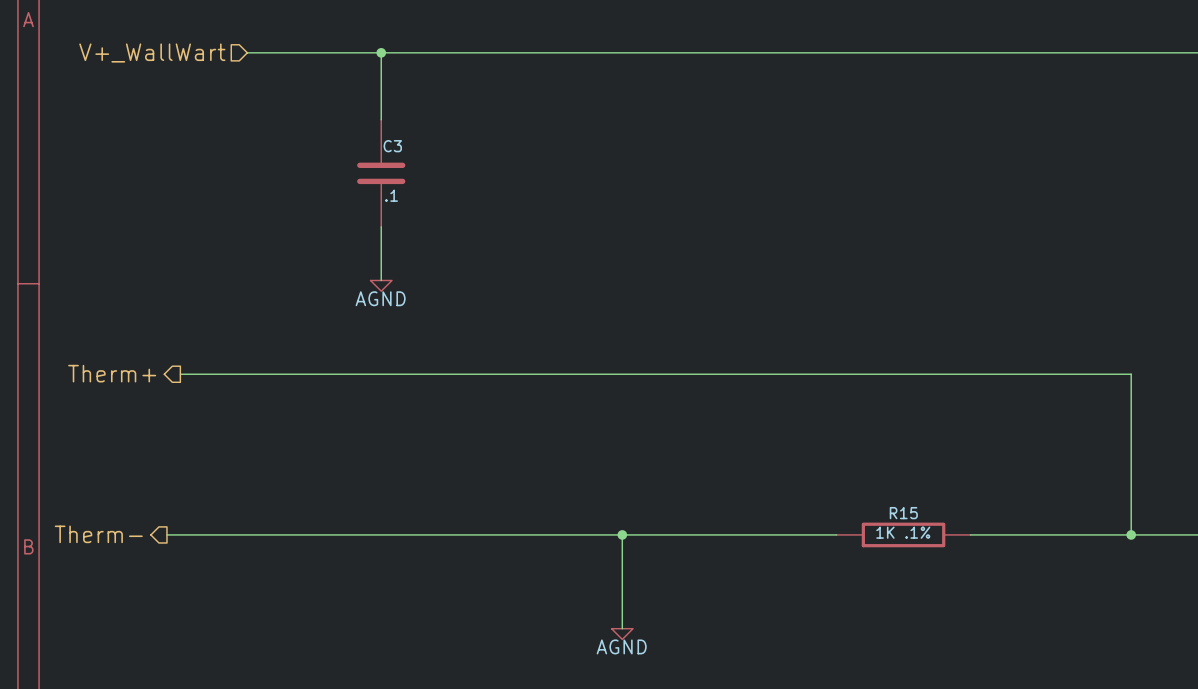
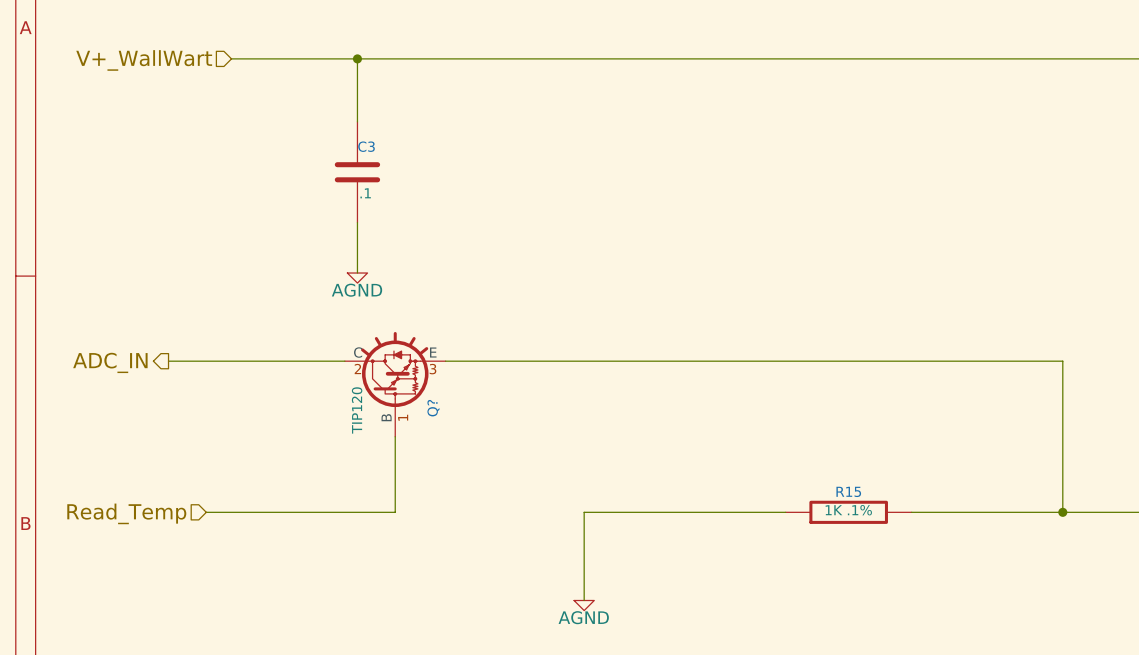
hierarchical label: Therm+ (112, 373) -> ADC_IN (110, 362)
Q?: none -> TIP120 (395, 384)
hierarchical label: Therm- (98, 534) -> none
wire: (166, 534) (220, 534) -> none
wire: (421, 534) (622, 534) -> (395, 512) (395, 436)
junction: (622, 534) -> none
hierarchical label: none -> Read_Temp (126, 513)

